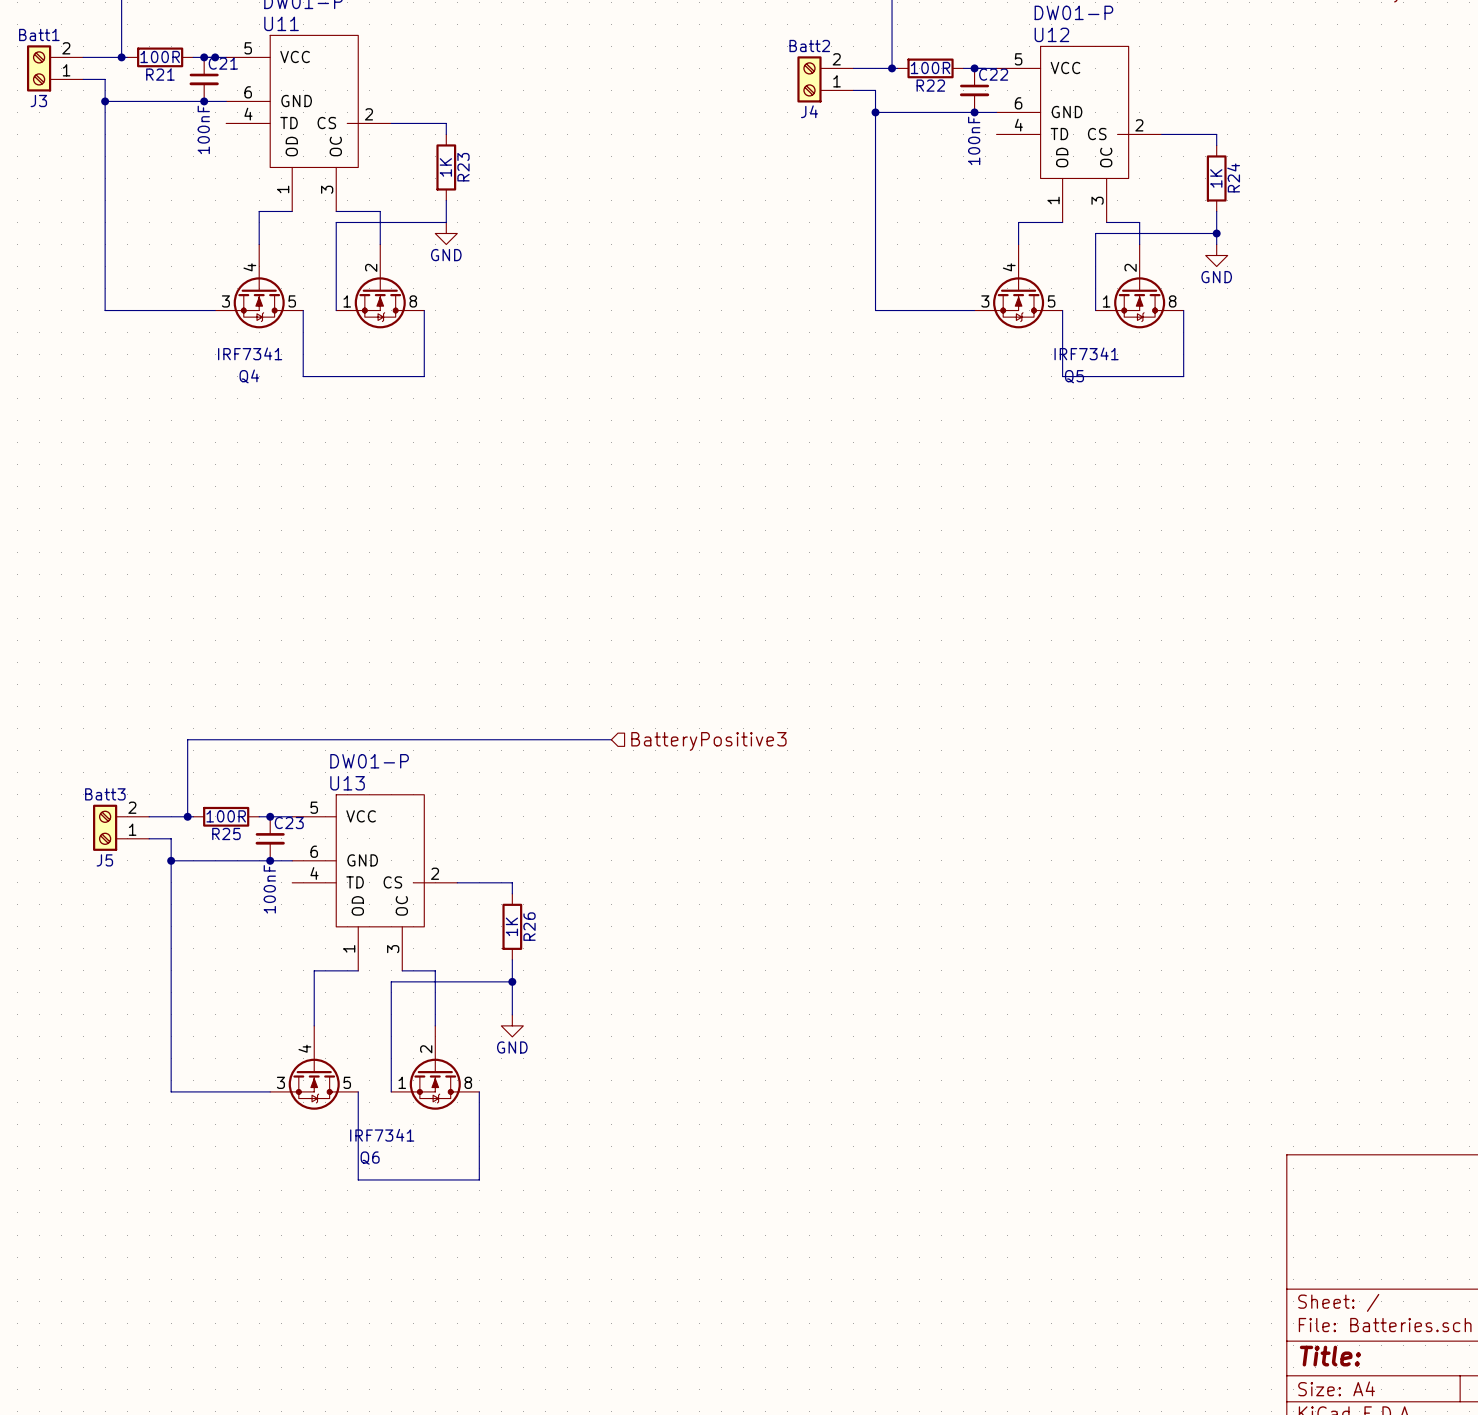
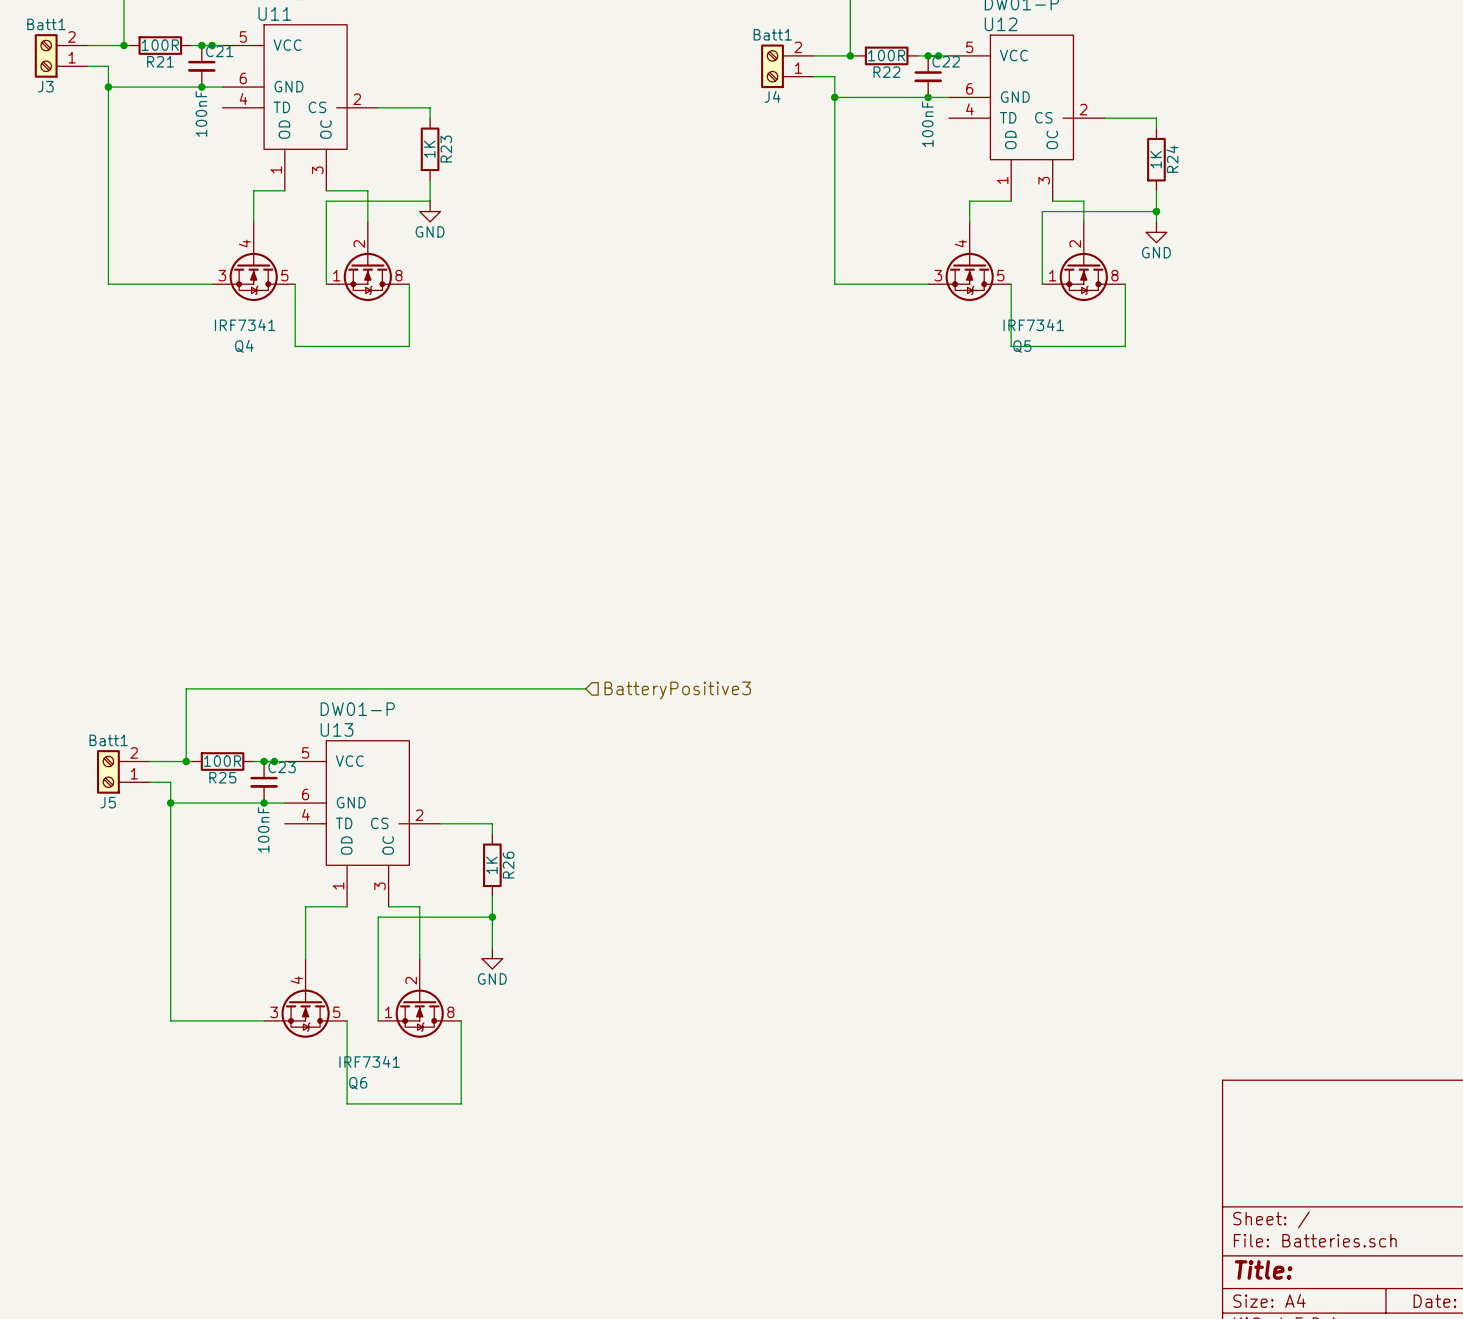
J4 value: Batt2 (809, 45) -> Batt1 (772, 34)
junction: none -> (938, 55)
J5 value: Batt3 (105, 794) -> Batt1 (108, 740)
junction: none -> (274, 761)

